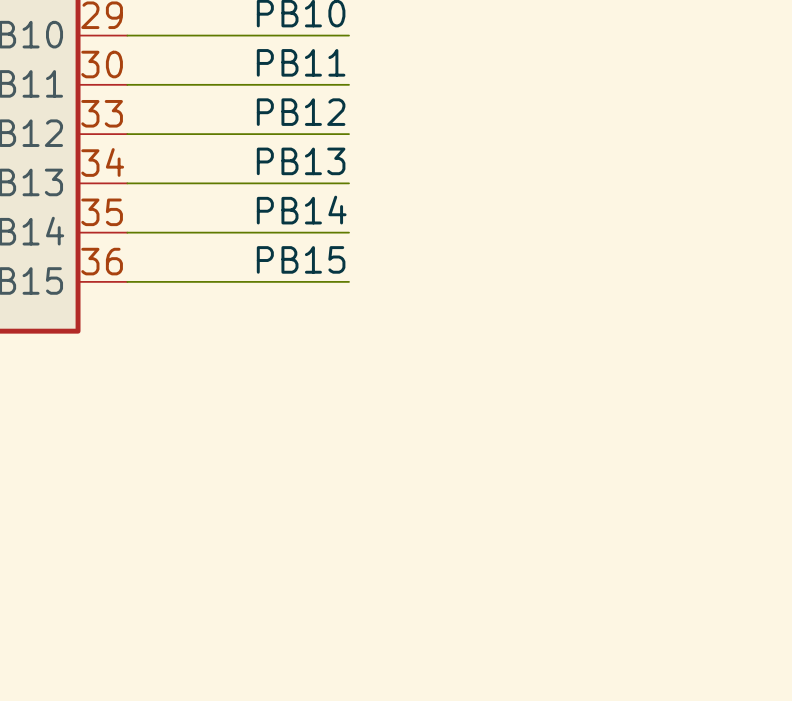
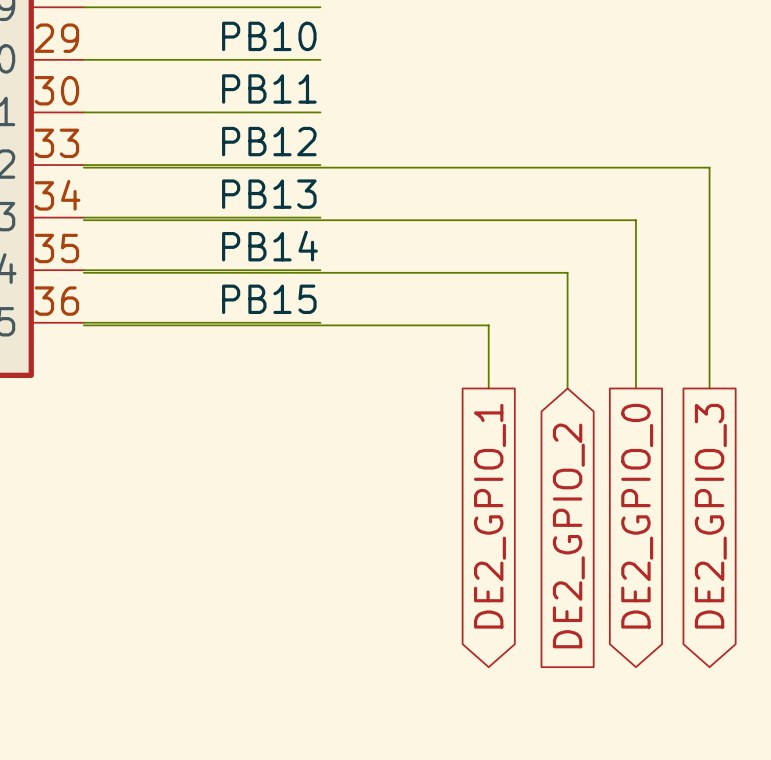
wire: none -> (83, 167) (709, 167) (709, 388)
wire: none -> (83, 220) (635, 220) (635, 388)
wire: none -> (83, 272) (567, 272) (567, 388)
wire: none -> (83, 325) (488, 325) (488, 388)
global label: none -> DE2_GPIO_1 (489, 516)
global label: none -> DE2_GPIO_0 (637, 516)
global label: none -> DE2_GPIO_3 (710, 516)
global label: none -> DE2_GPIO_2 (568, 535)

